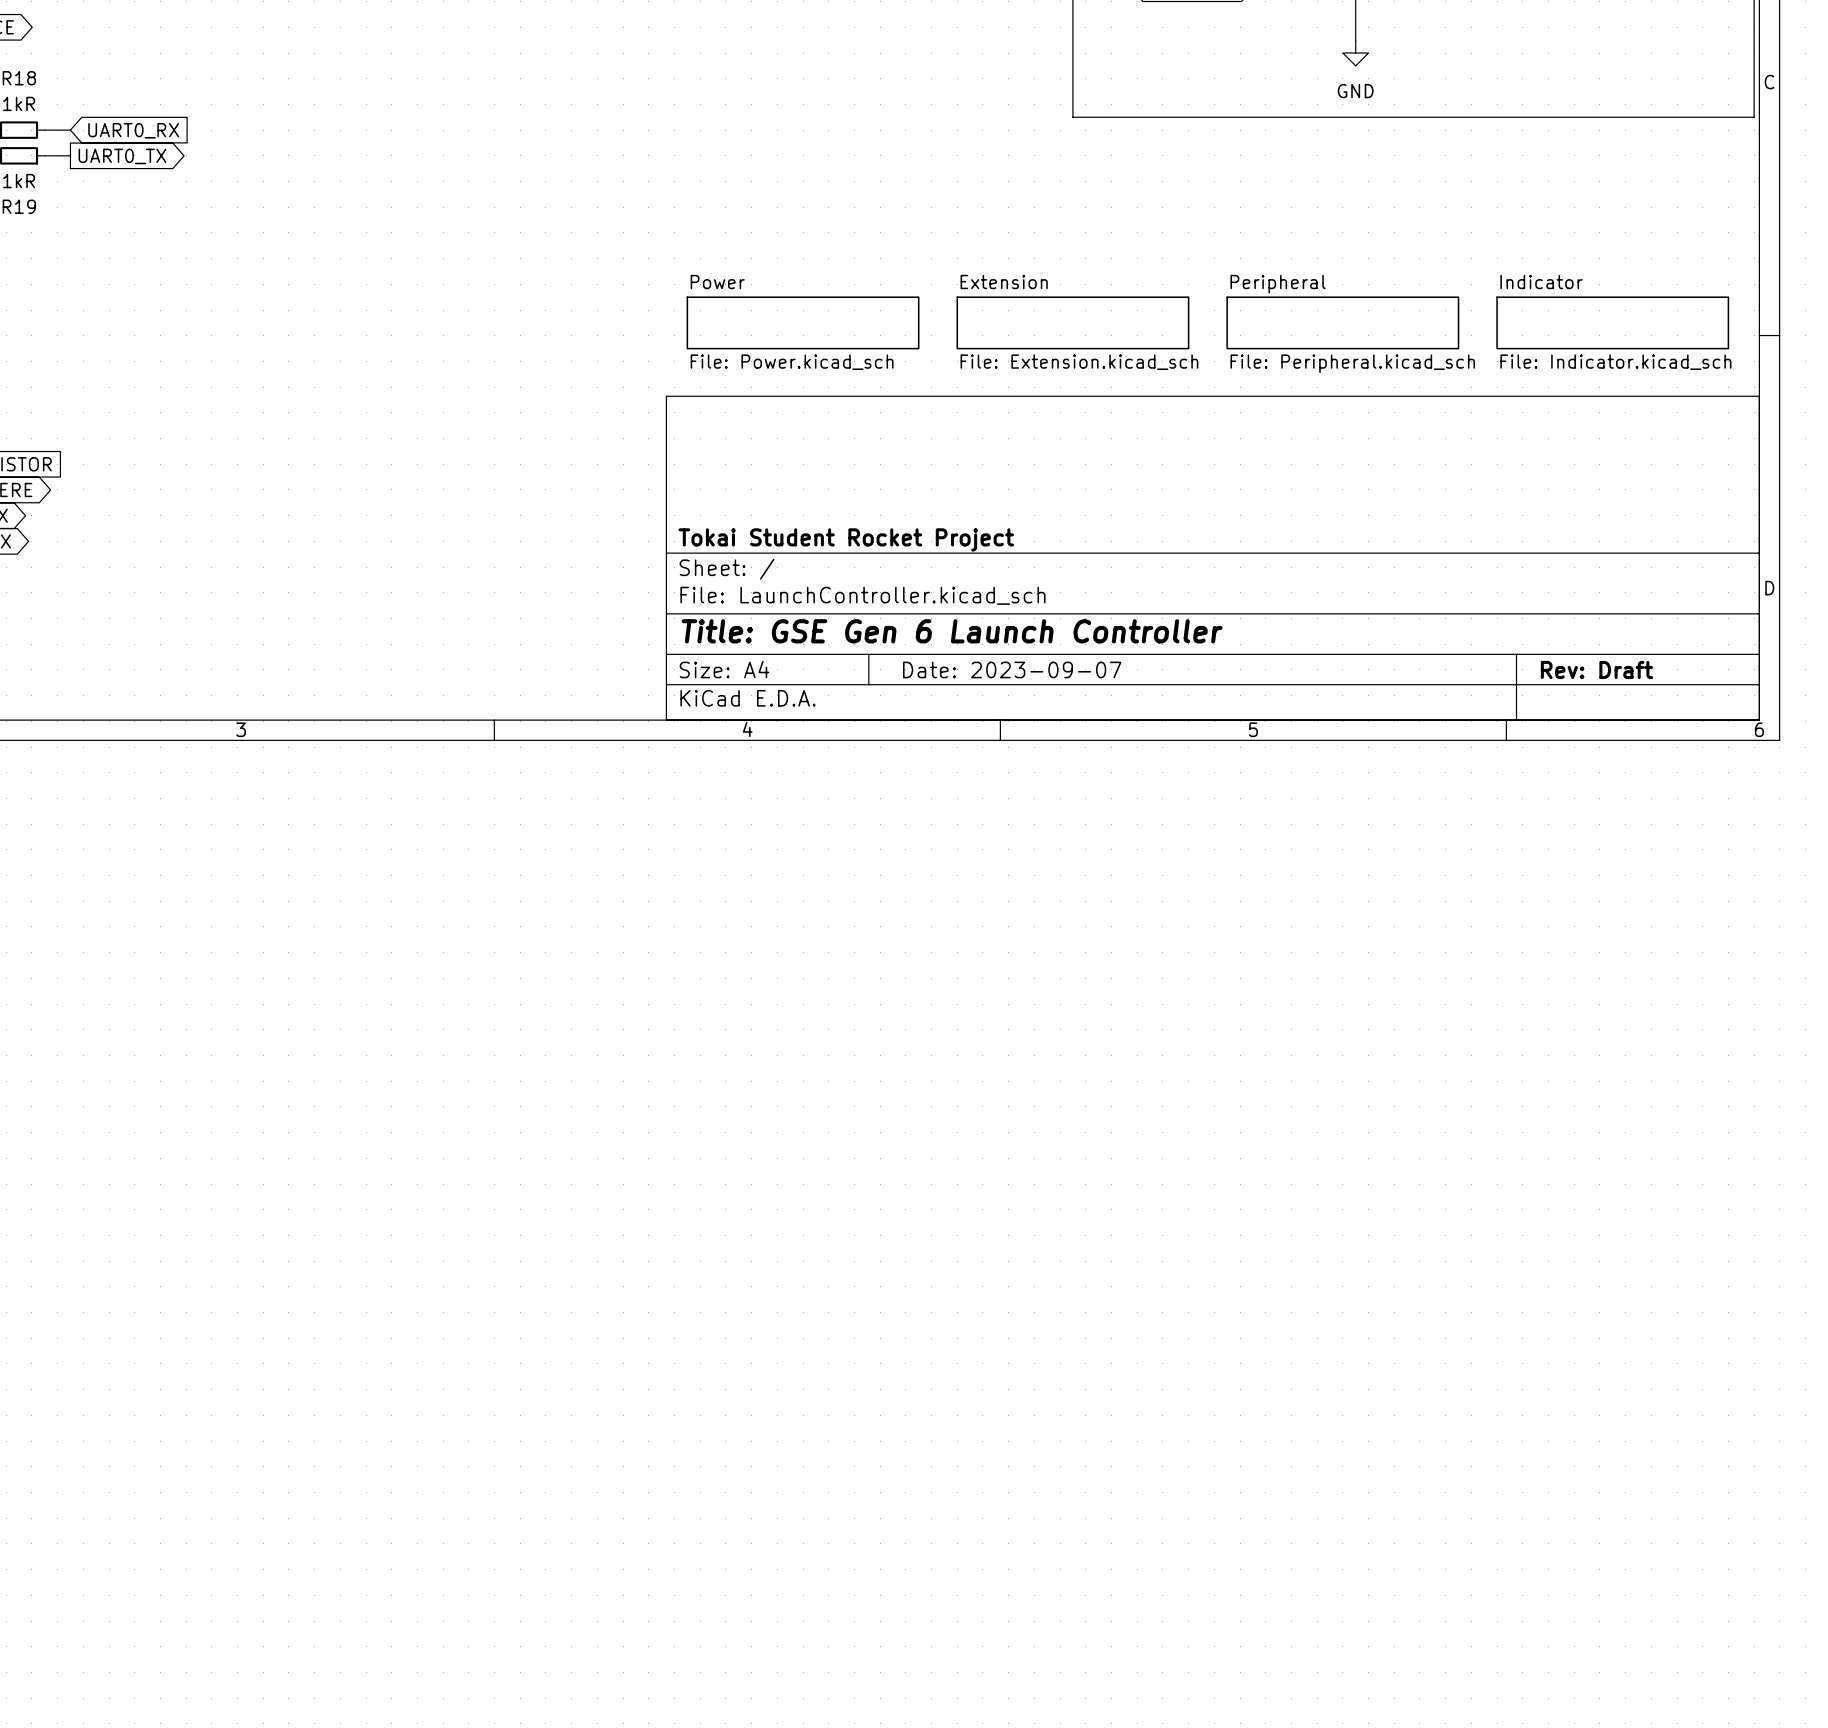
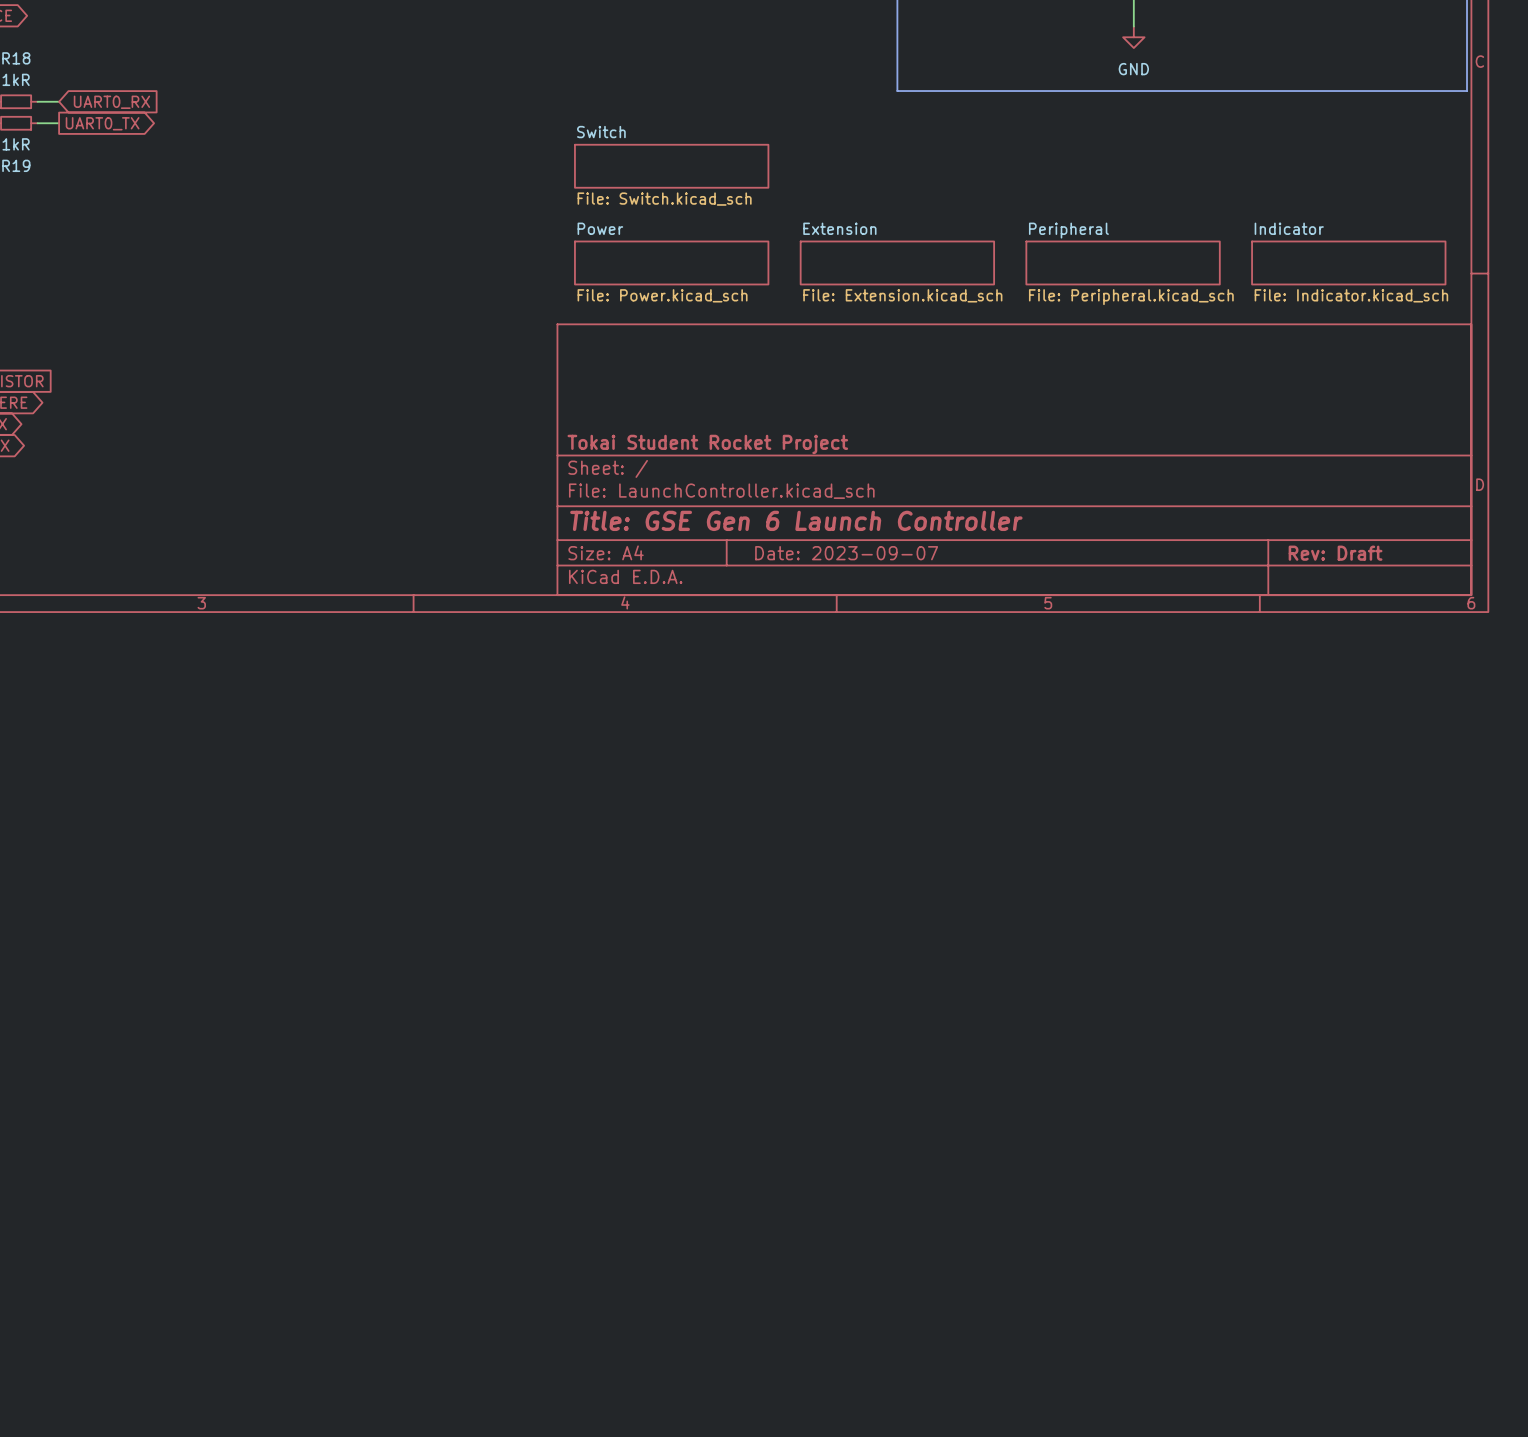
sheet Switch: none -> File: Switch.kicad_sch (671, 166)

